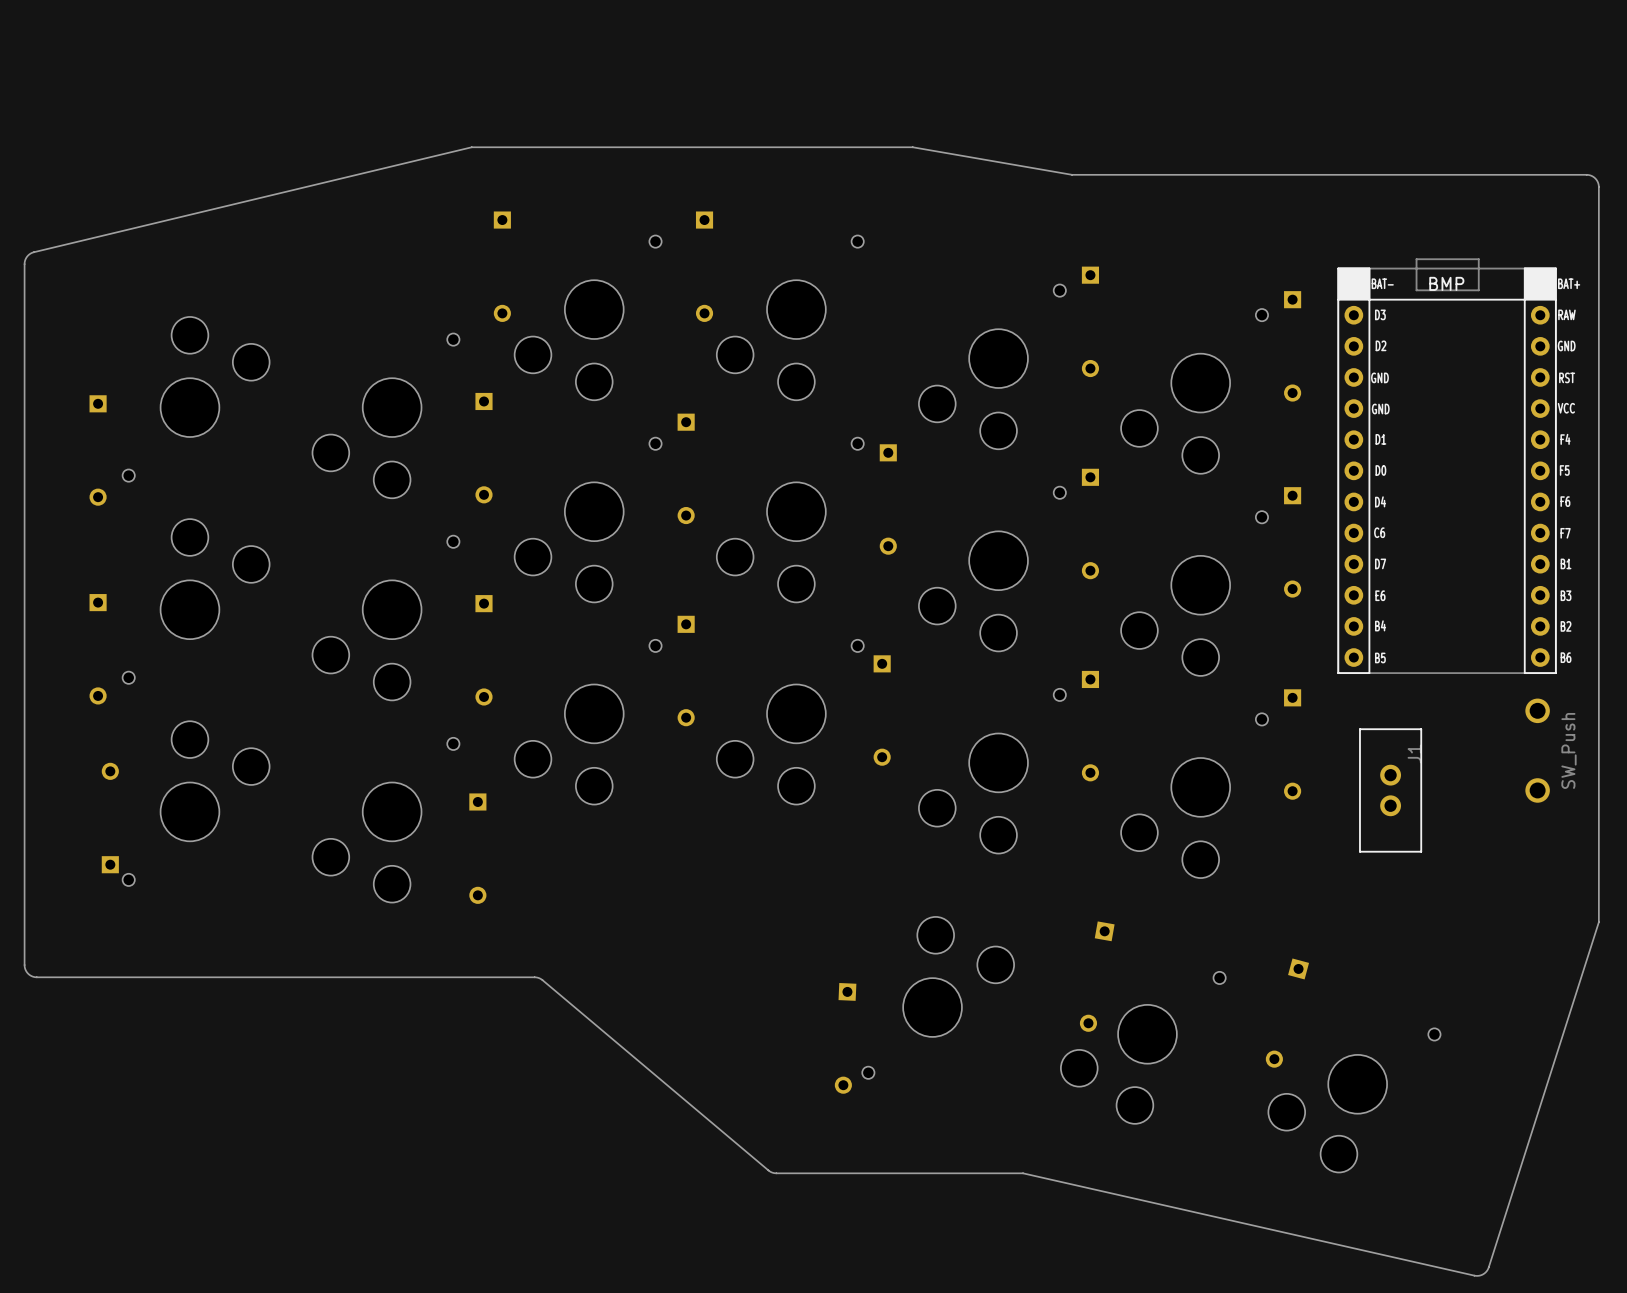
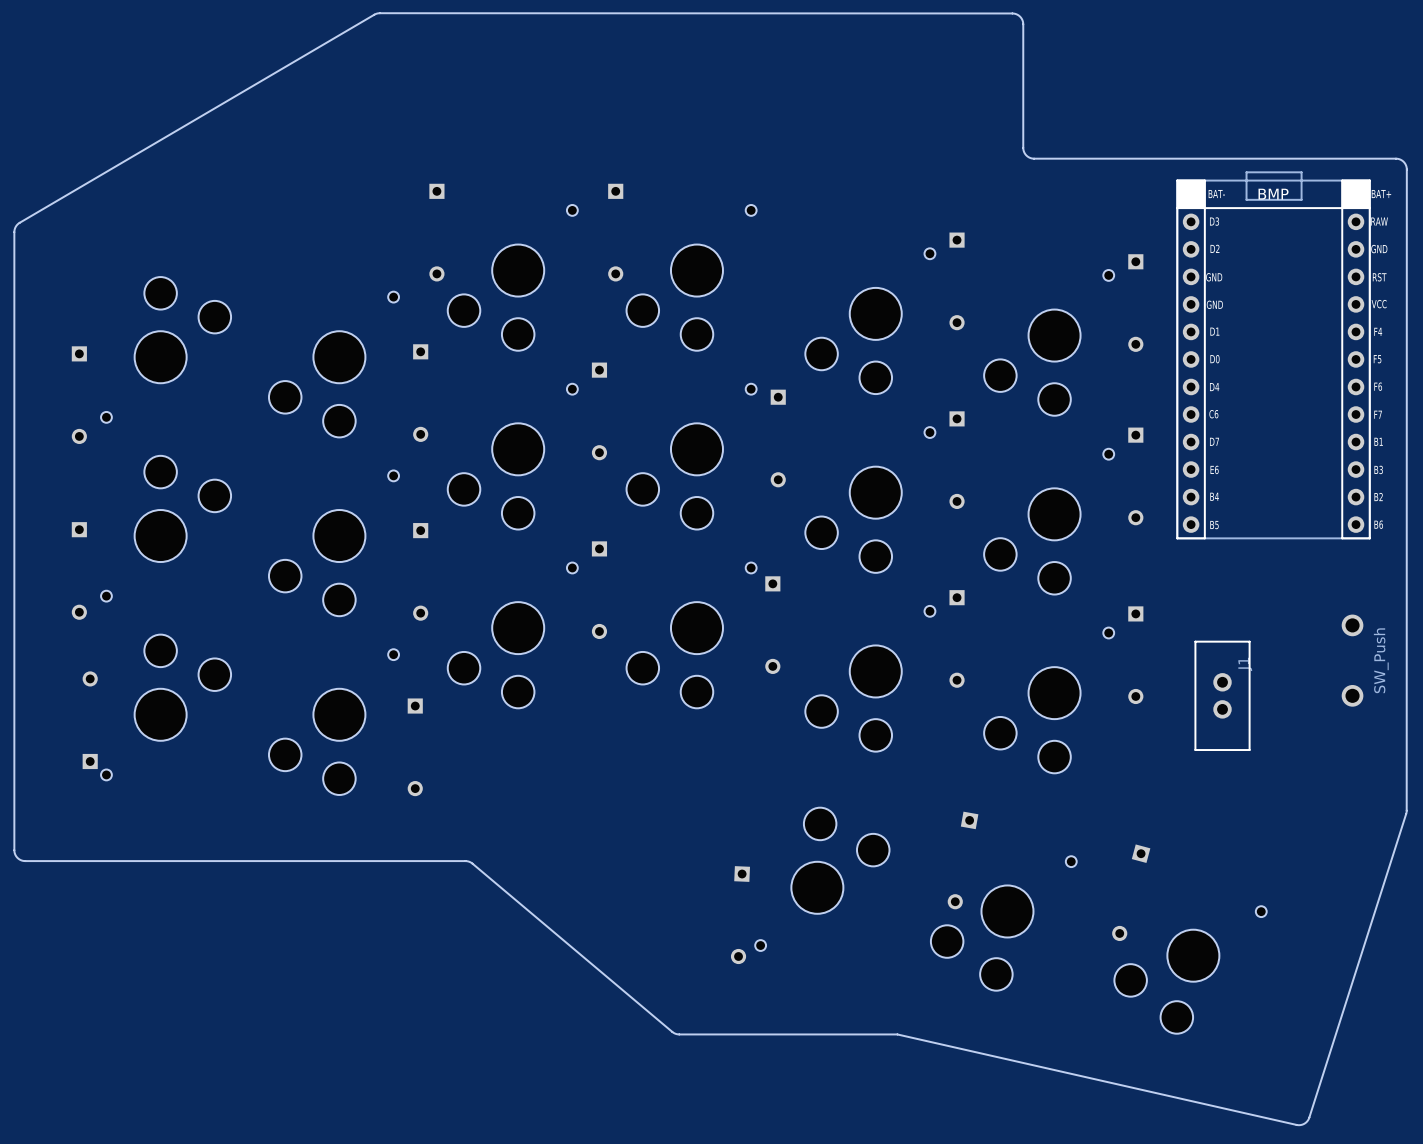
board edge: (24, 266) (26, 257) (33, 252) (471, 147) (912, 147) (1072, 174) (1591, 176) (1597, 180) (1598, 187) (1598, 923) -> (14, 232) (19, 222) (378, 13) (1013, 13) (1020, 16) (1023, 22) (1023, 147) (1025, 154) (1030, 158) (1400, 159) (1405, 163) (1406, 169) (1406, 813)
part position: (1447, 466) -> (1273, 355)

